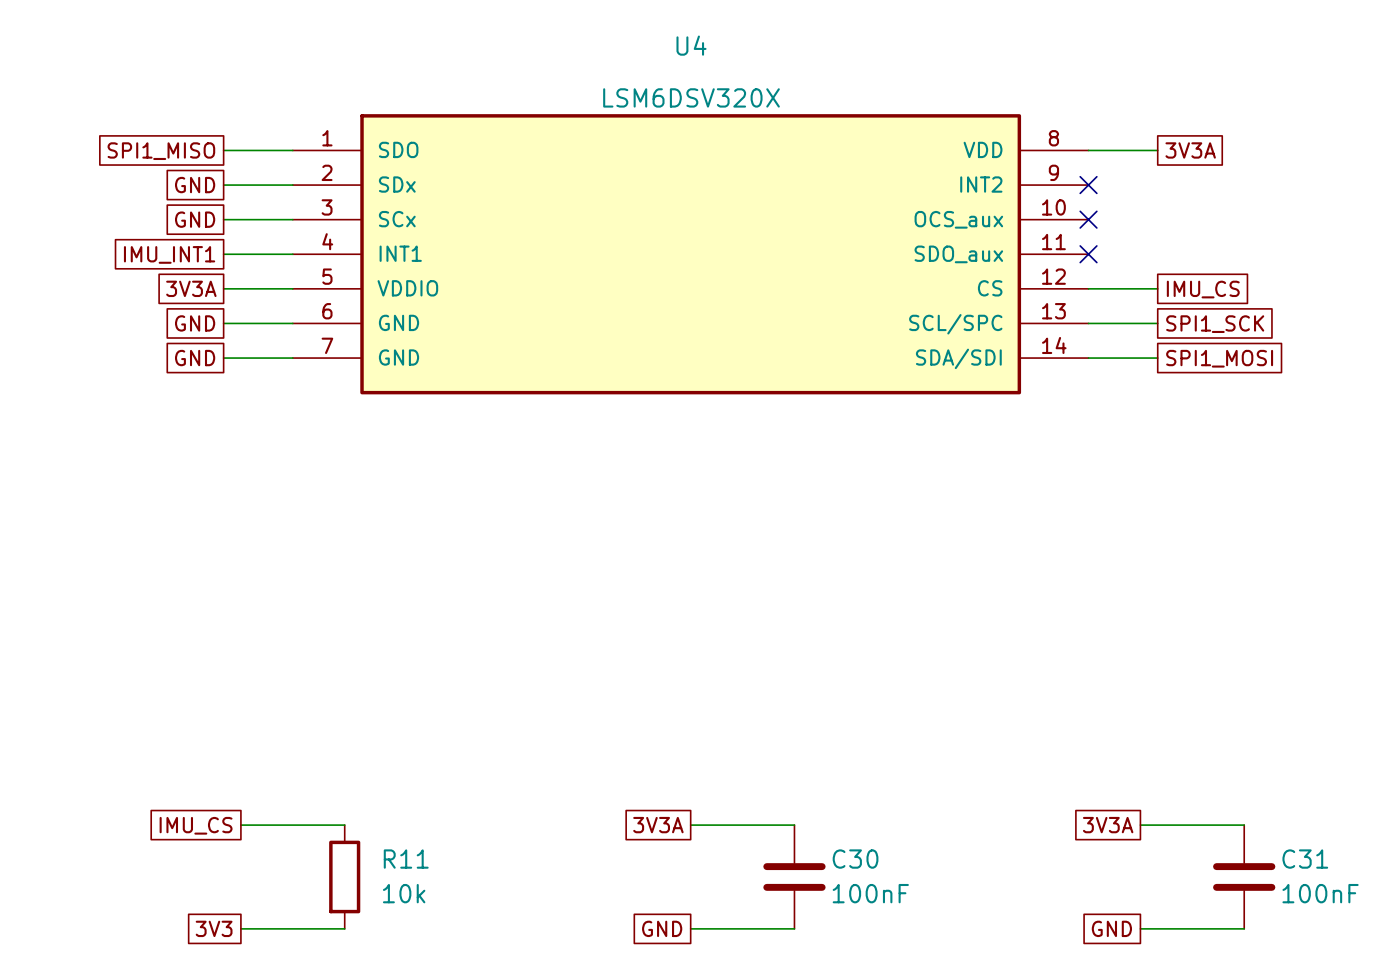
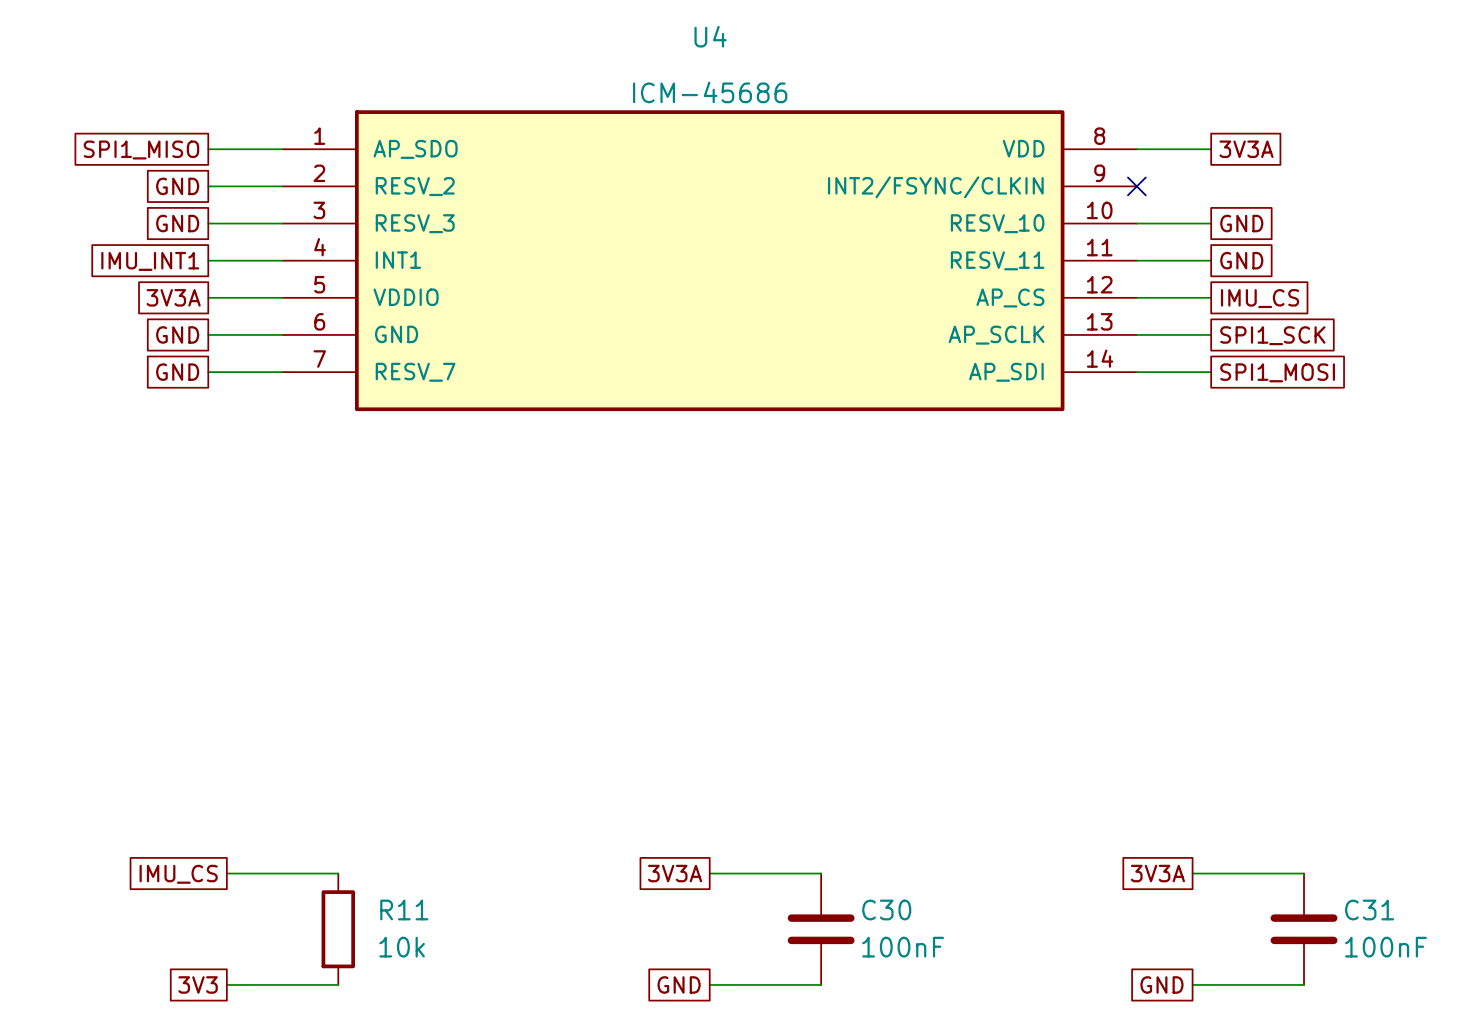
U4 value: LSM6DSV320X (691, 97) -> ICM-45686 (710, 92)
U4 symbol: [292, 114, 1089, 395] -> [282, 110, 1137, 412]
wire: none -> (1136, 223) (1211, 223)
no-connect mark: (1088, 219) -> none
global label: none -> GND (1241, 223)
wire: none -> (1136, 260) (1211, 260)
no-connect mark: (1088, 254) -> none
global label: none -> GND (1241, 260)

